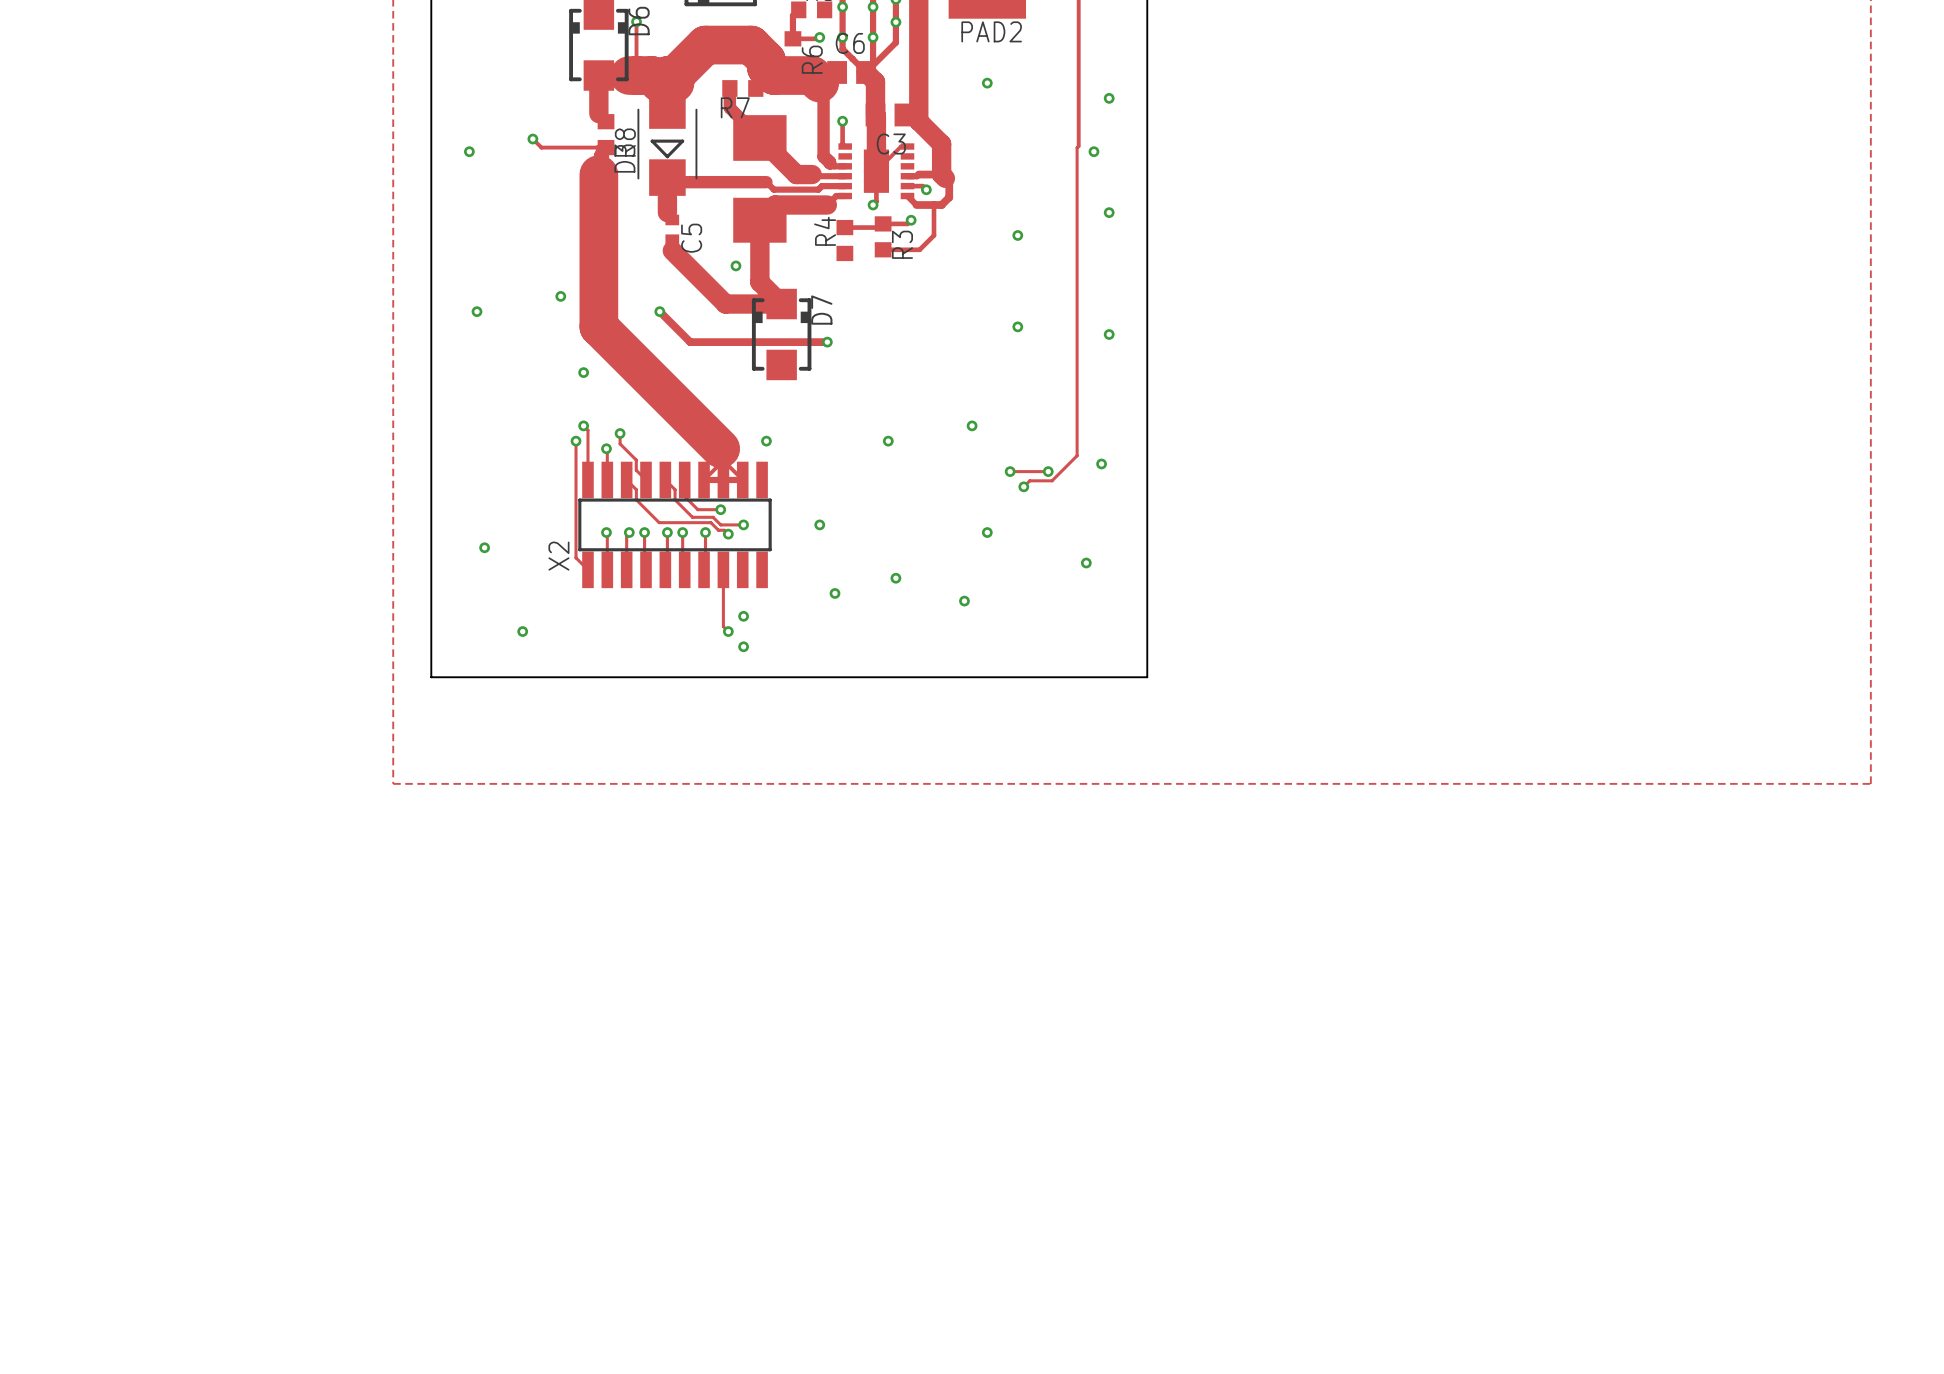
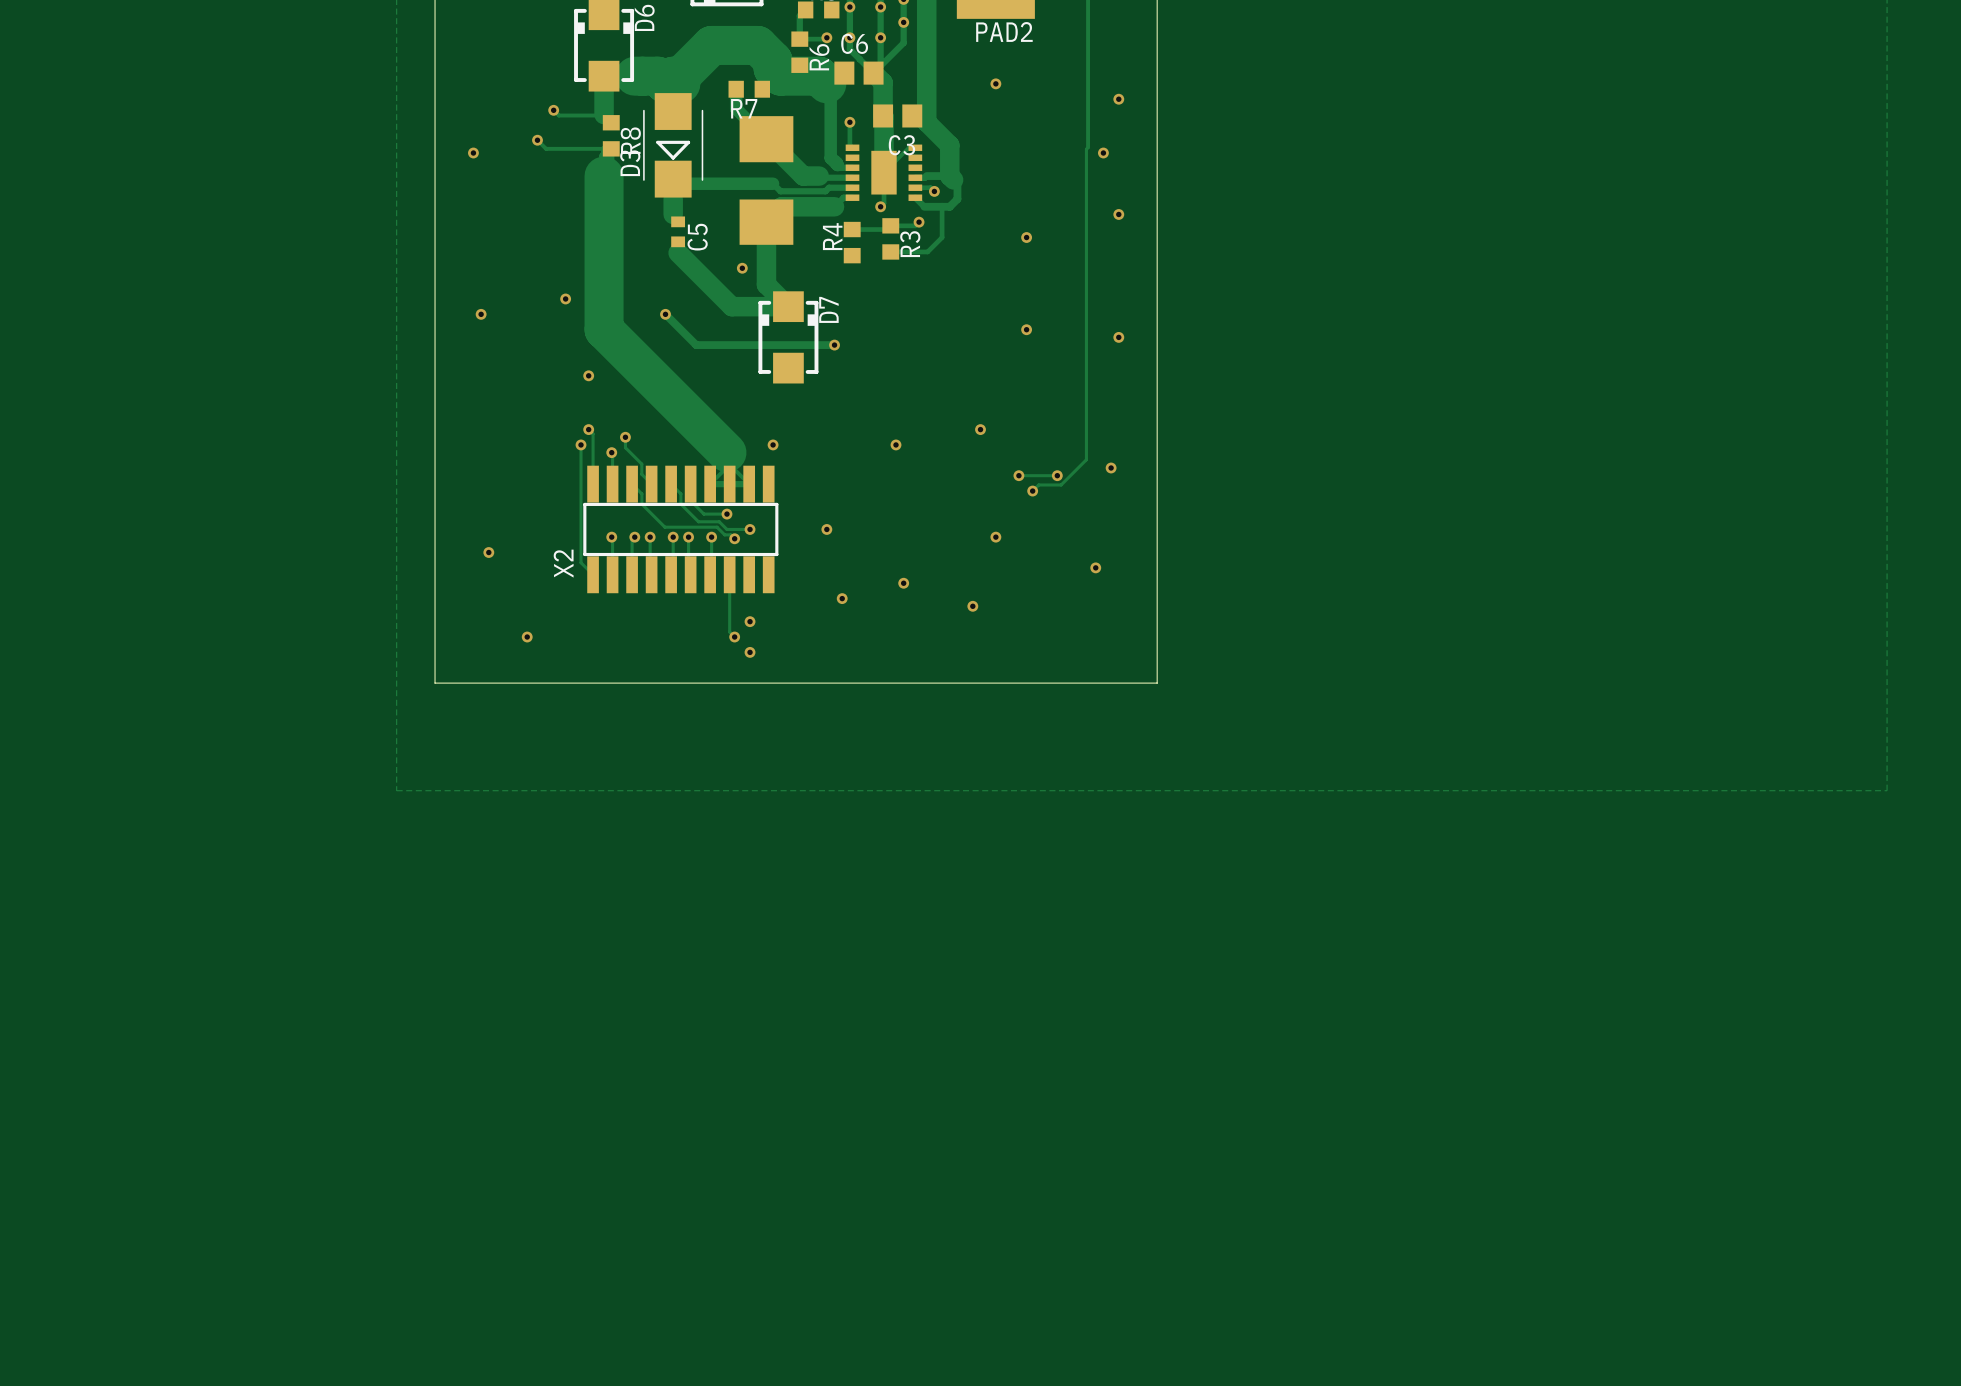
track: (636, 21) (636, 75) -> none
via: (636, 21) -> none
track: none -> (553, 110) (558, 115) (604, 115)
via: none -> (553, 110)

